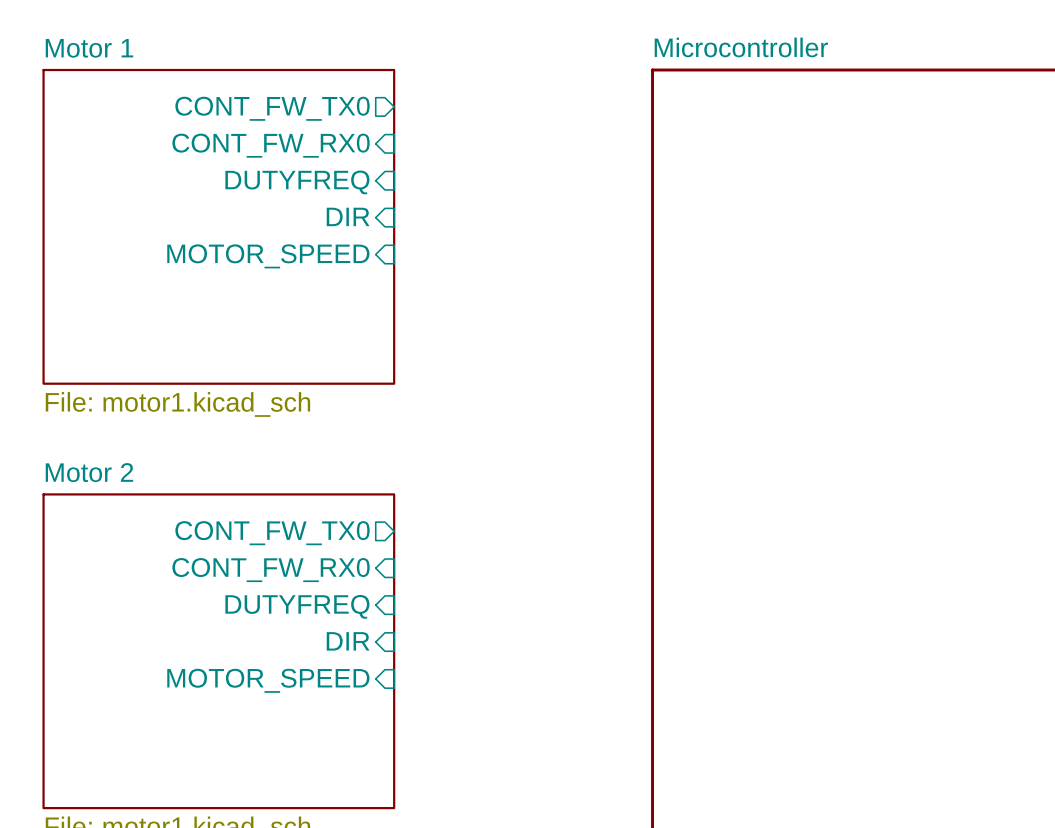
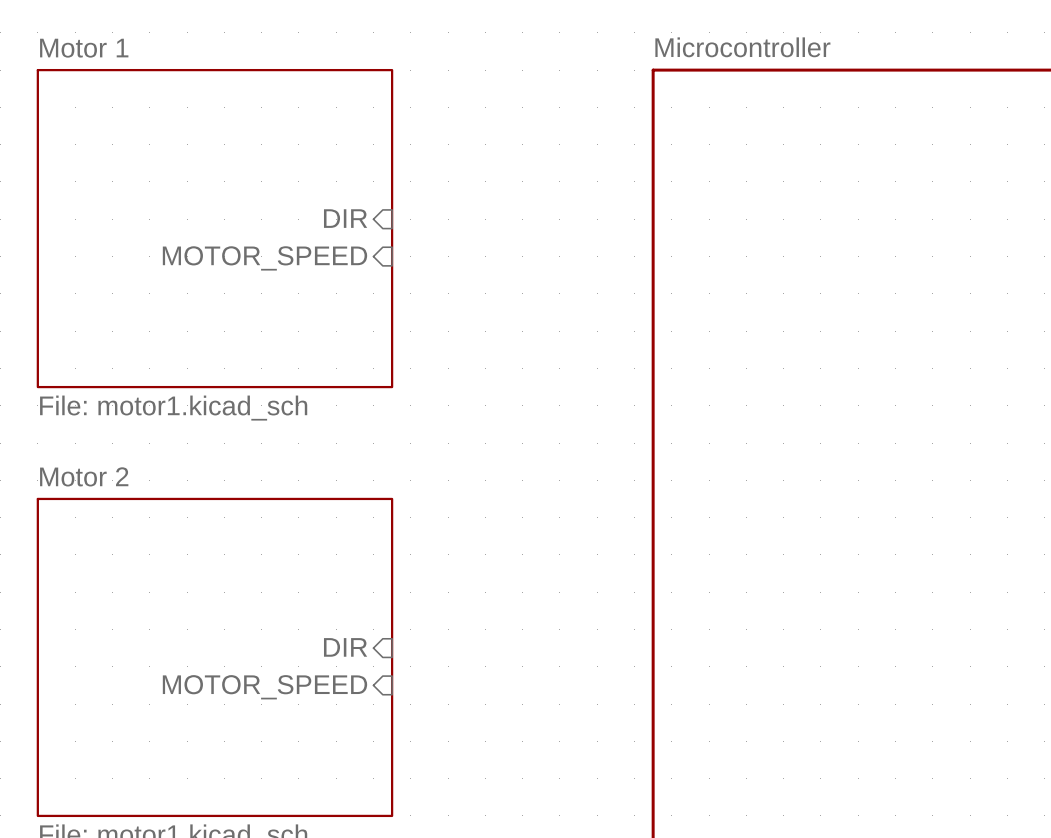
sheet pin: CONT_FW_TX0 (272, 108) -> none
sheet pin: CONT_FW_RX0 (271, 145) -> none
sheet pin: DUTYFREQ (297, 182) -> none
sheet pin: CONT_FW_TX0 (272, 533) -> none
sheet pin: CONT_FW_RX0 (271, 570) -> none
sheet pin: DUTYFREQ (297, 606) -> none

